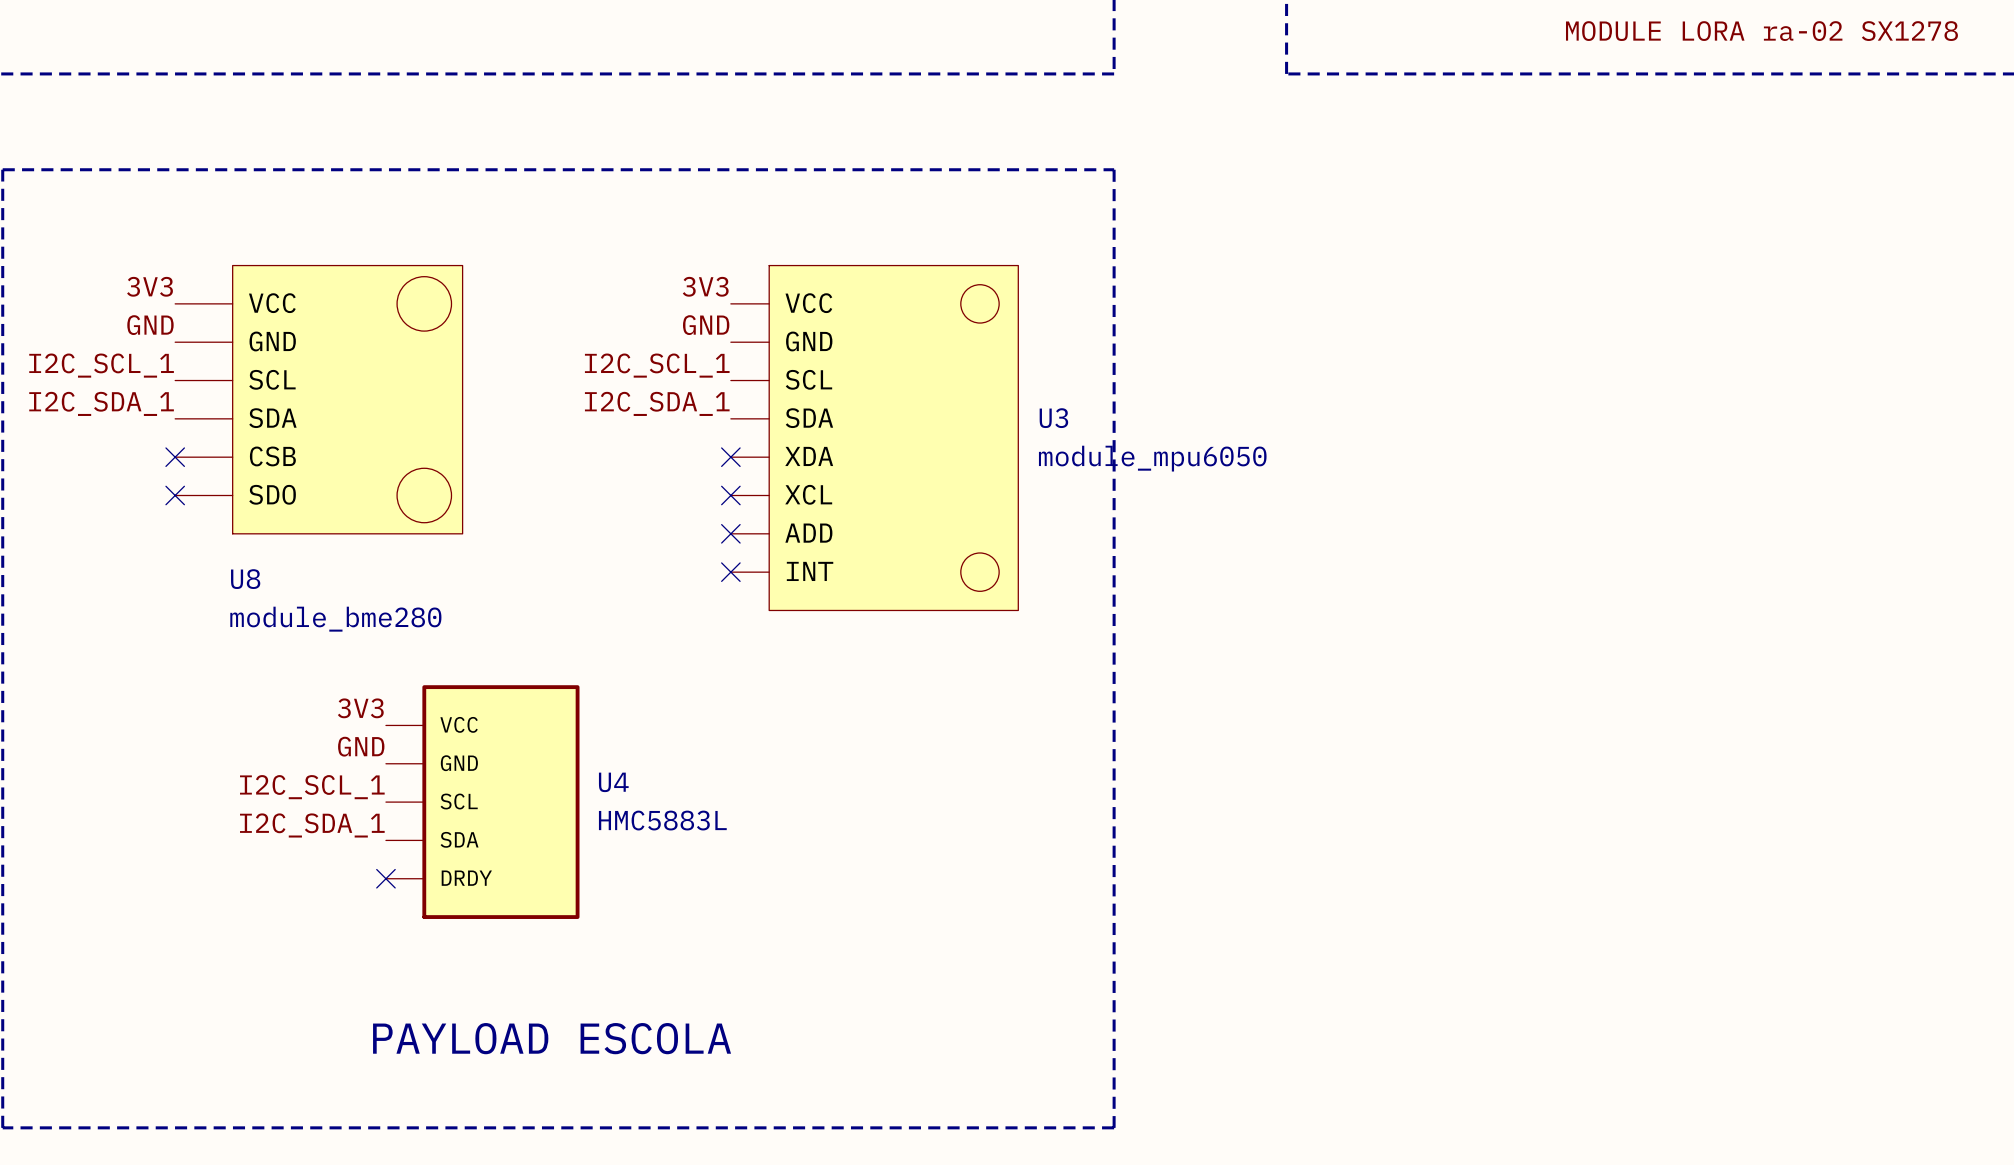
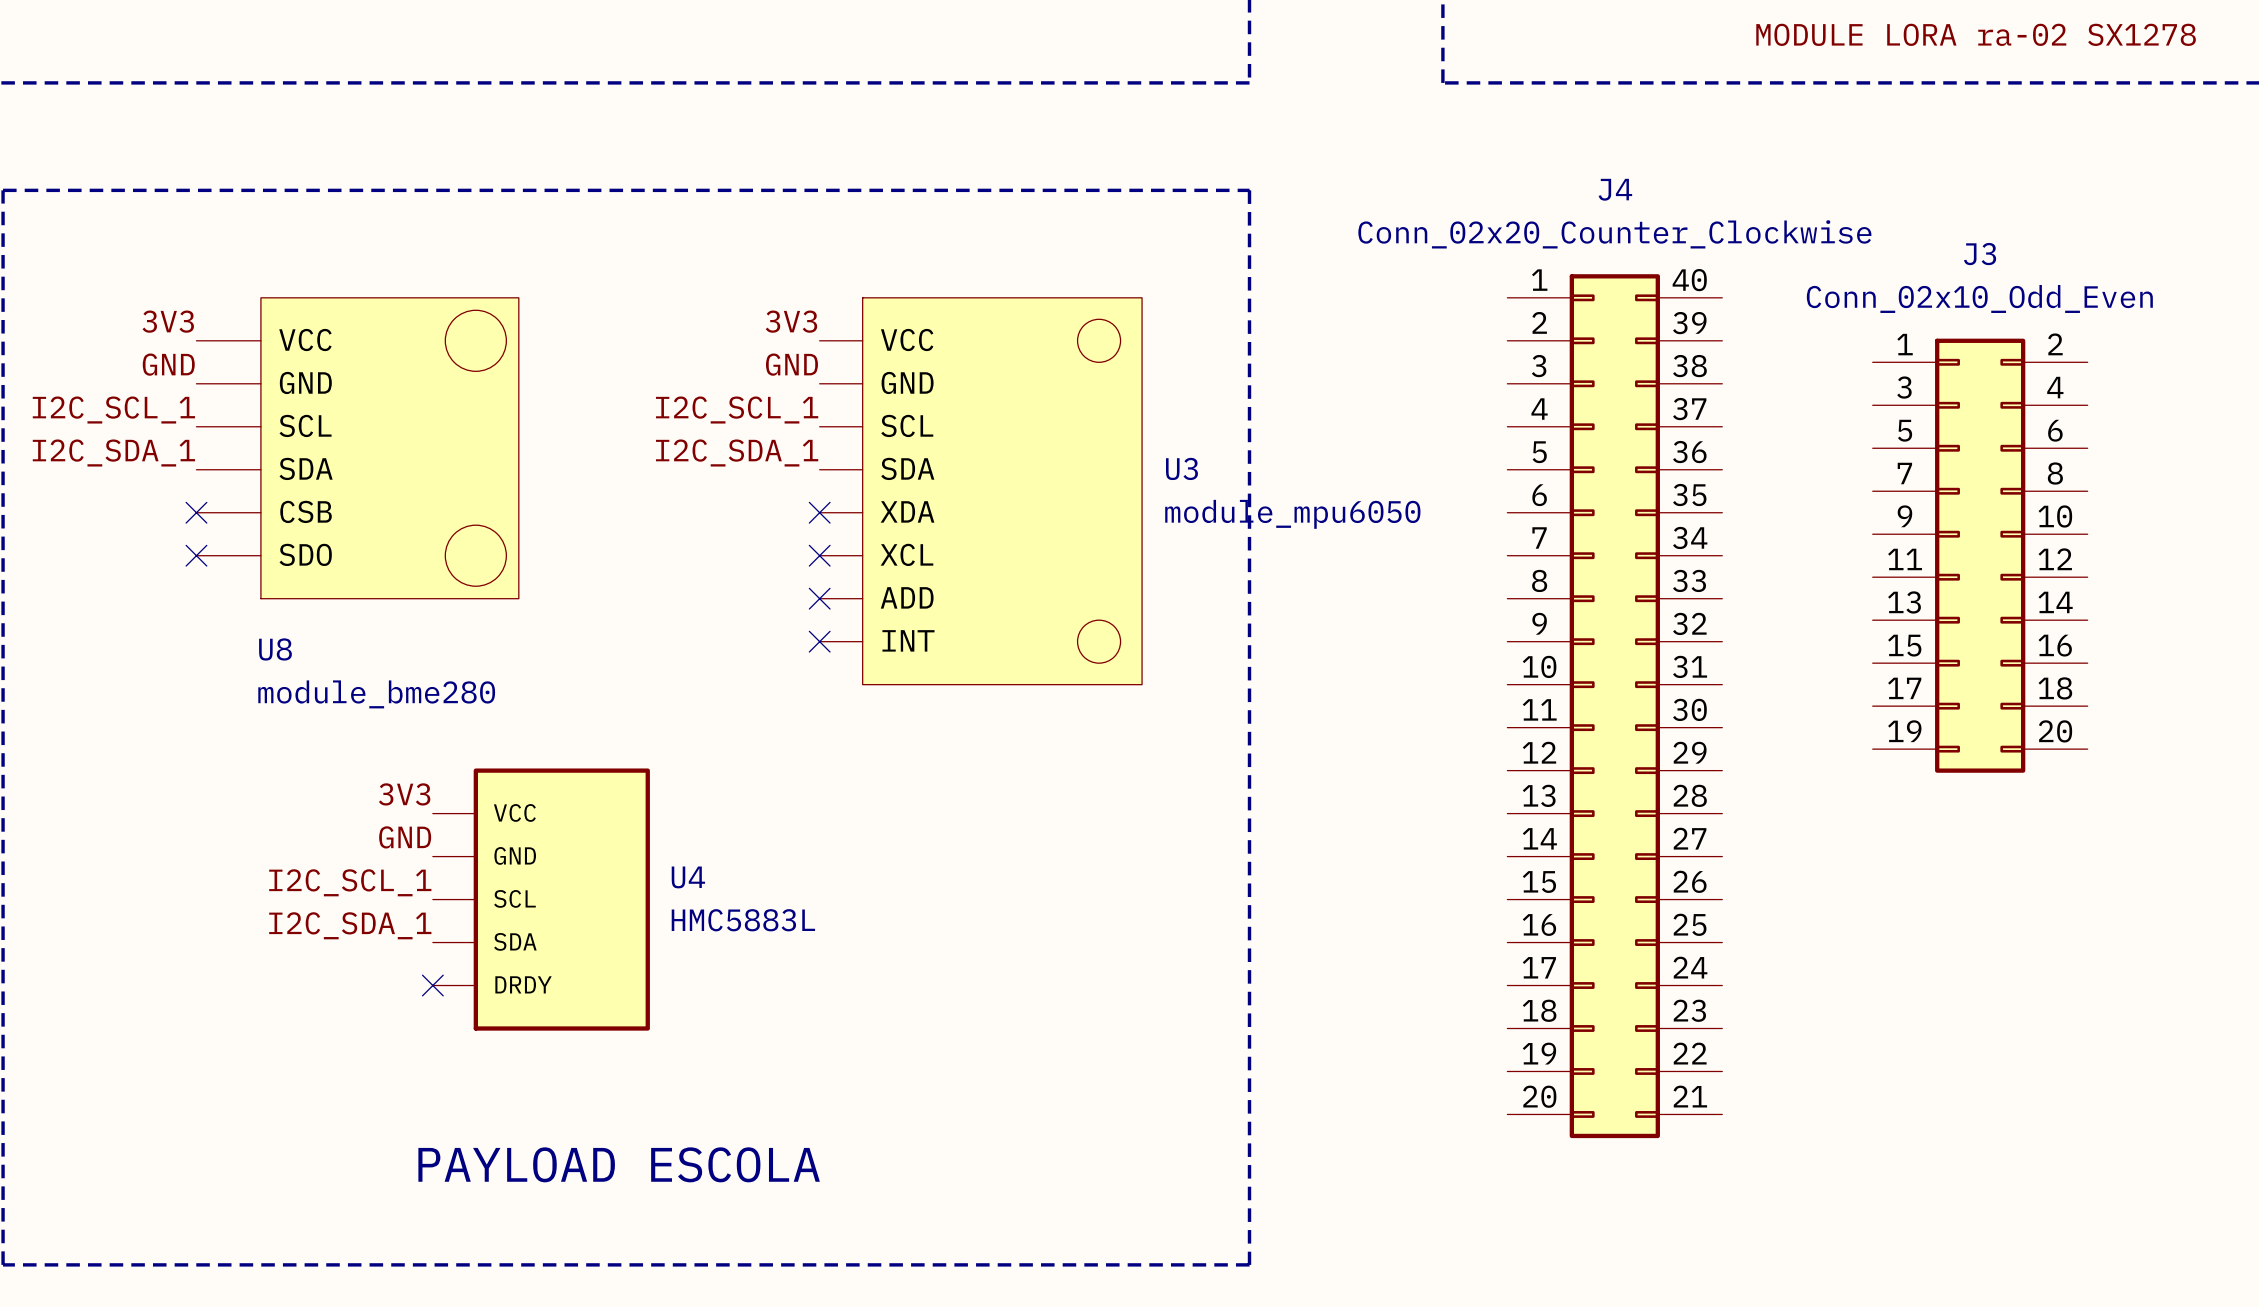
J3: none -> Conn_02x10_Odd_Even (1980, 555)
J4: none -> Conn_02x20_Counter_Clockwise (1614, 706)

